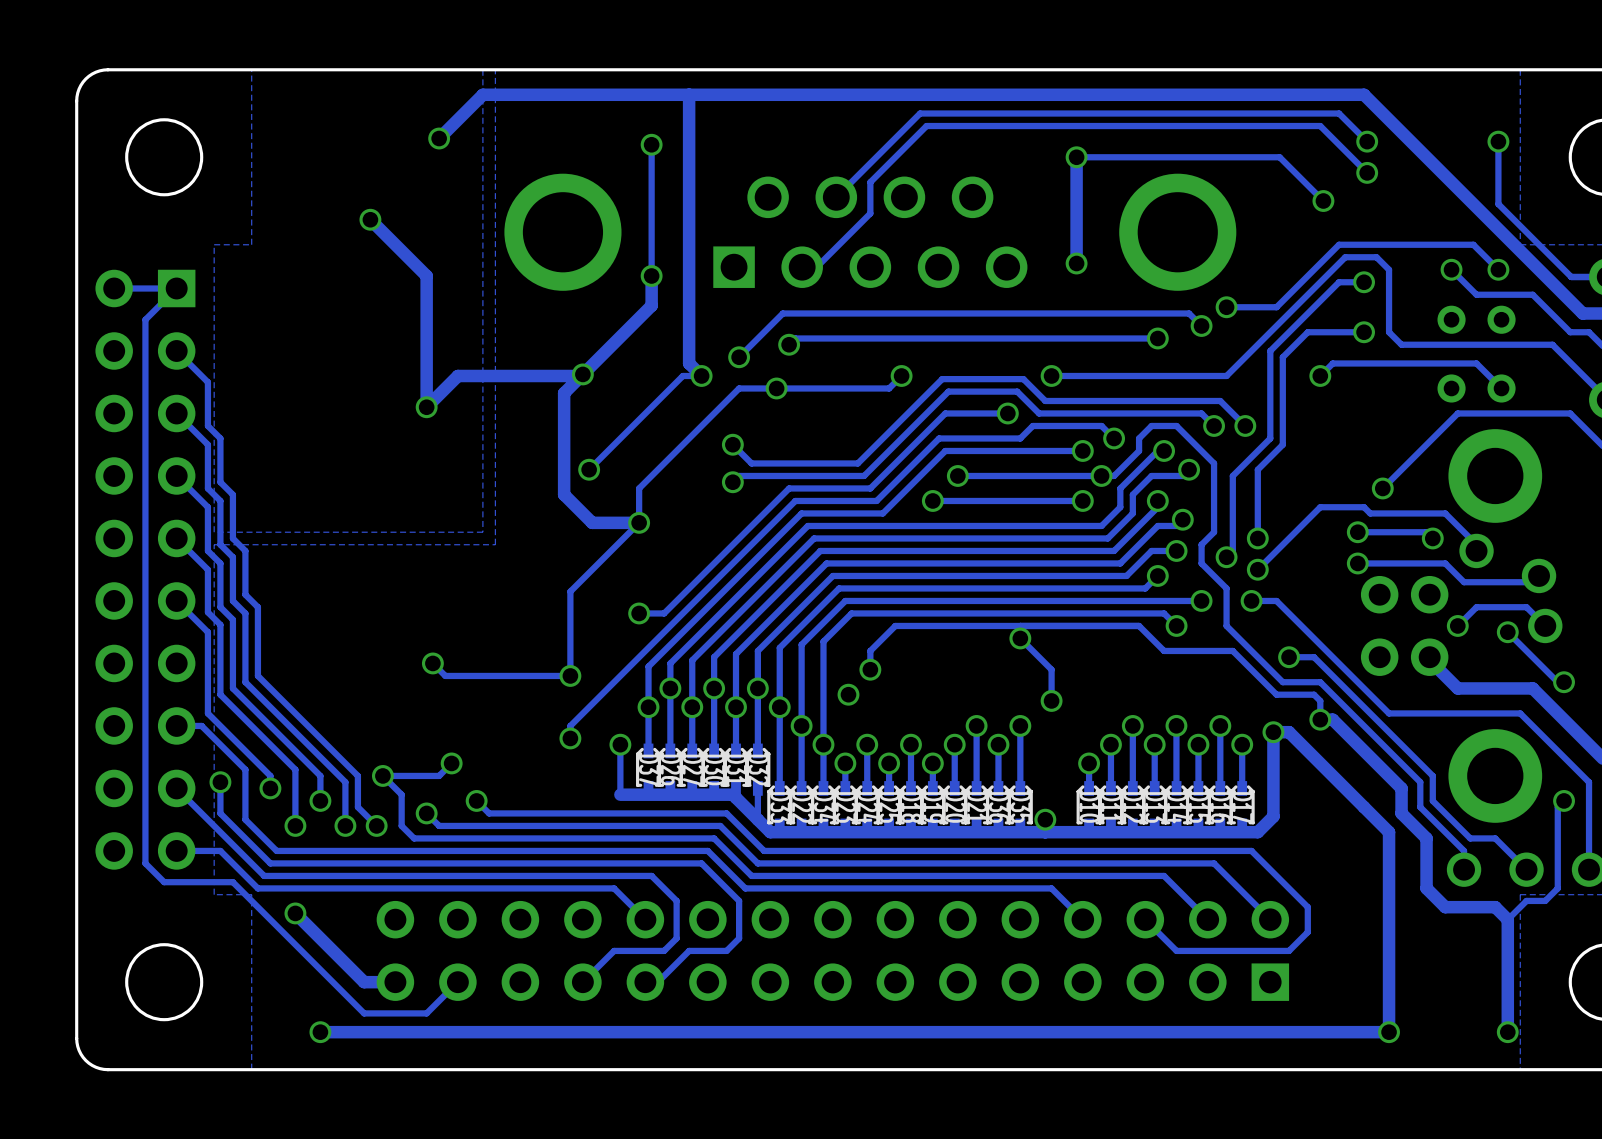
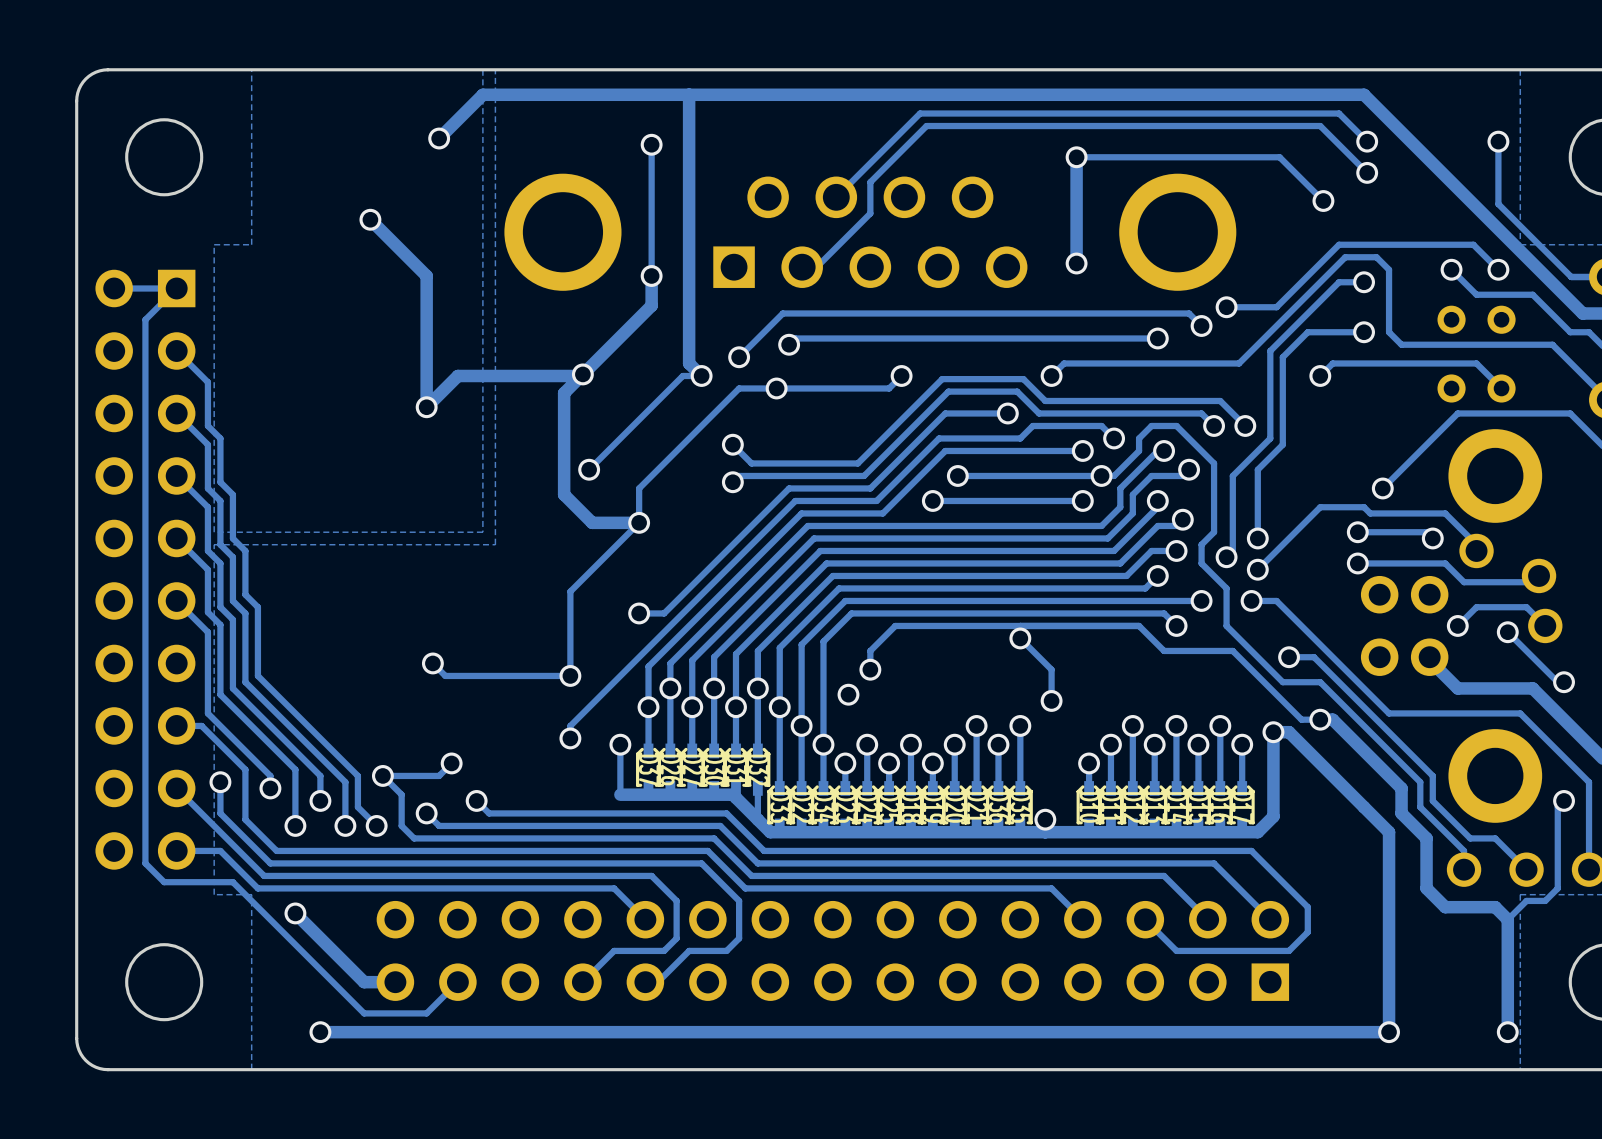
track: (1239, 363) (1226, 375) (1051, 375) -> (1239, 363) (1064, 363) (1051, 375)
track: (1276, 694) (1314, 694) (1320, 700) (1320, 719) -> (1276, 694) (1301, 719) (1320, 719)

